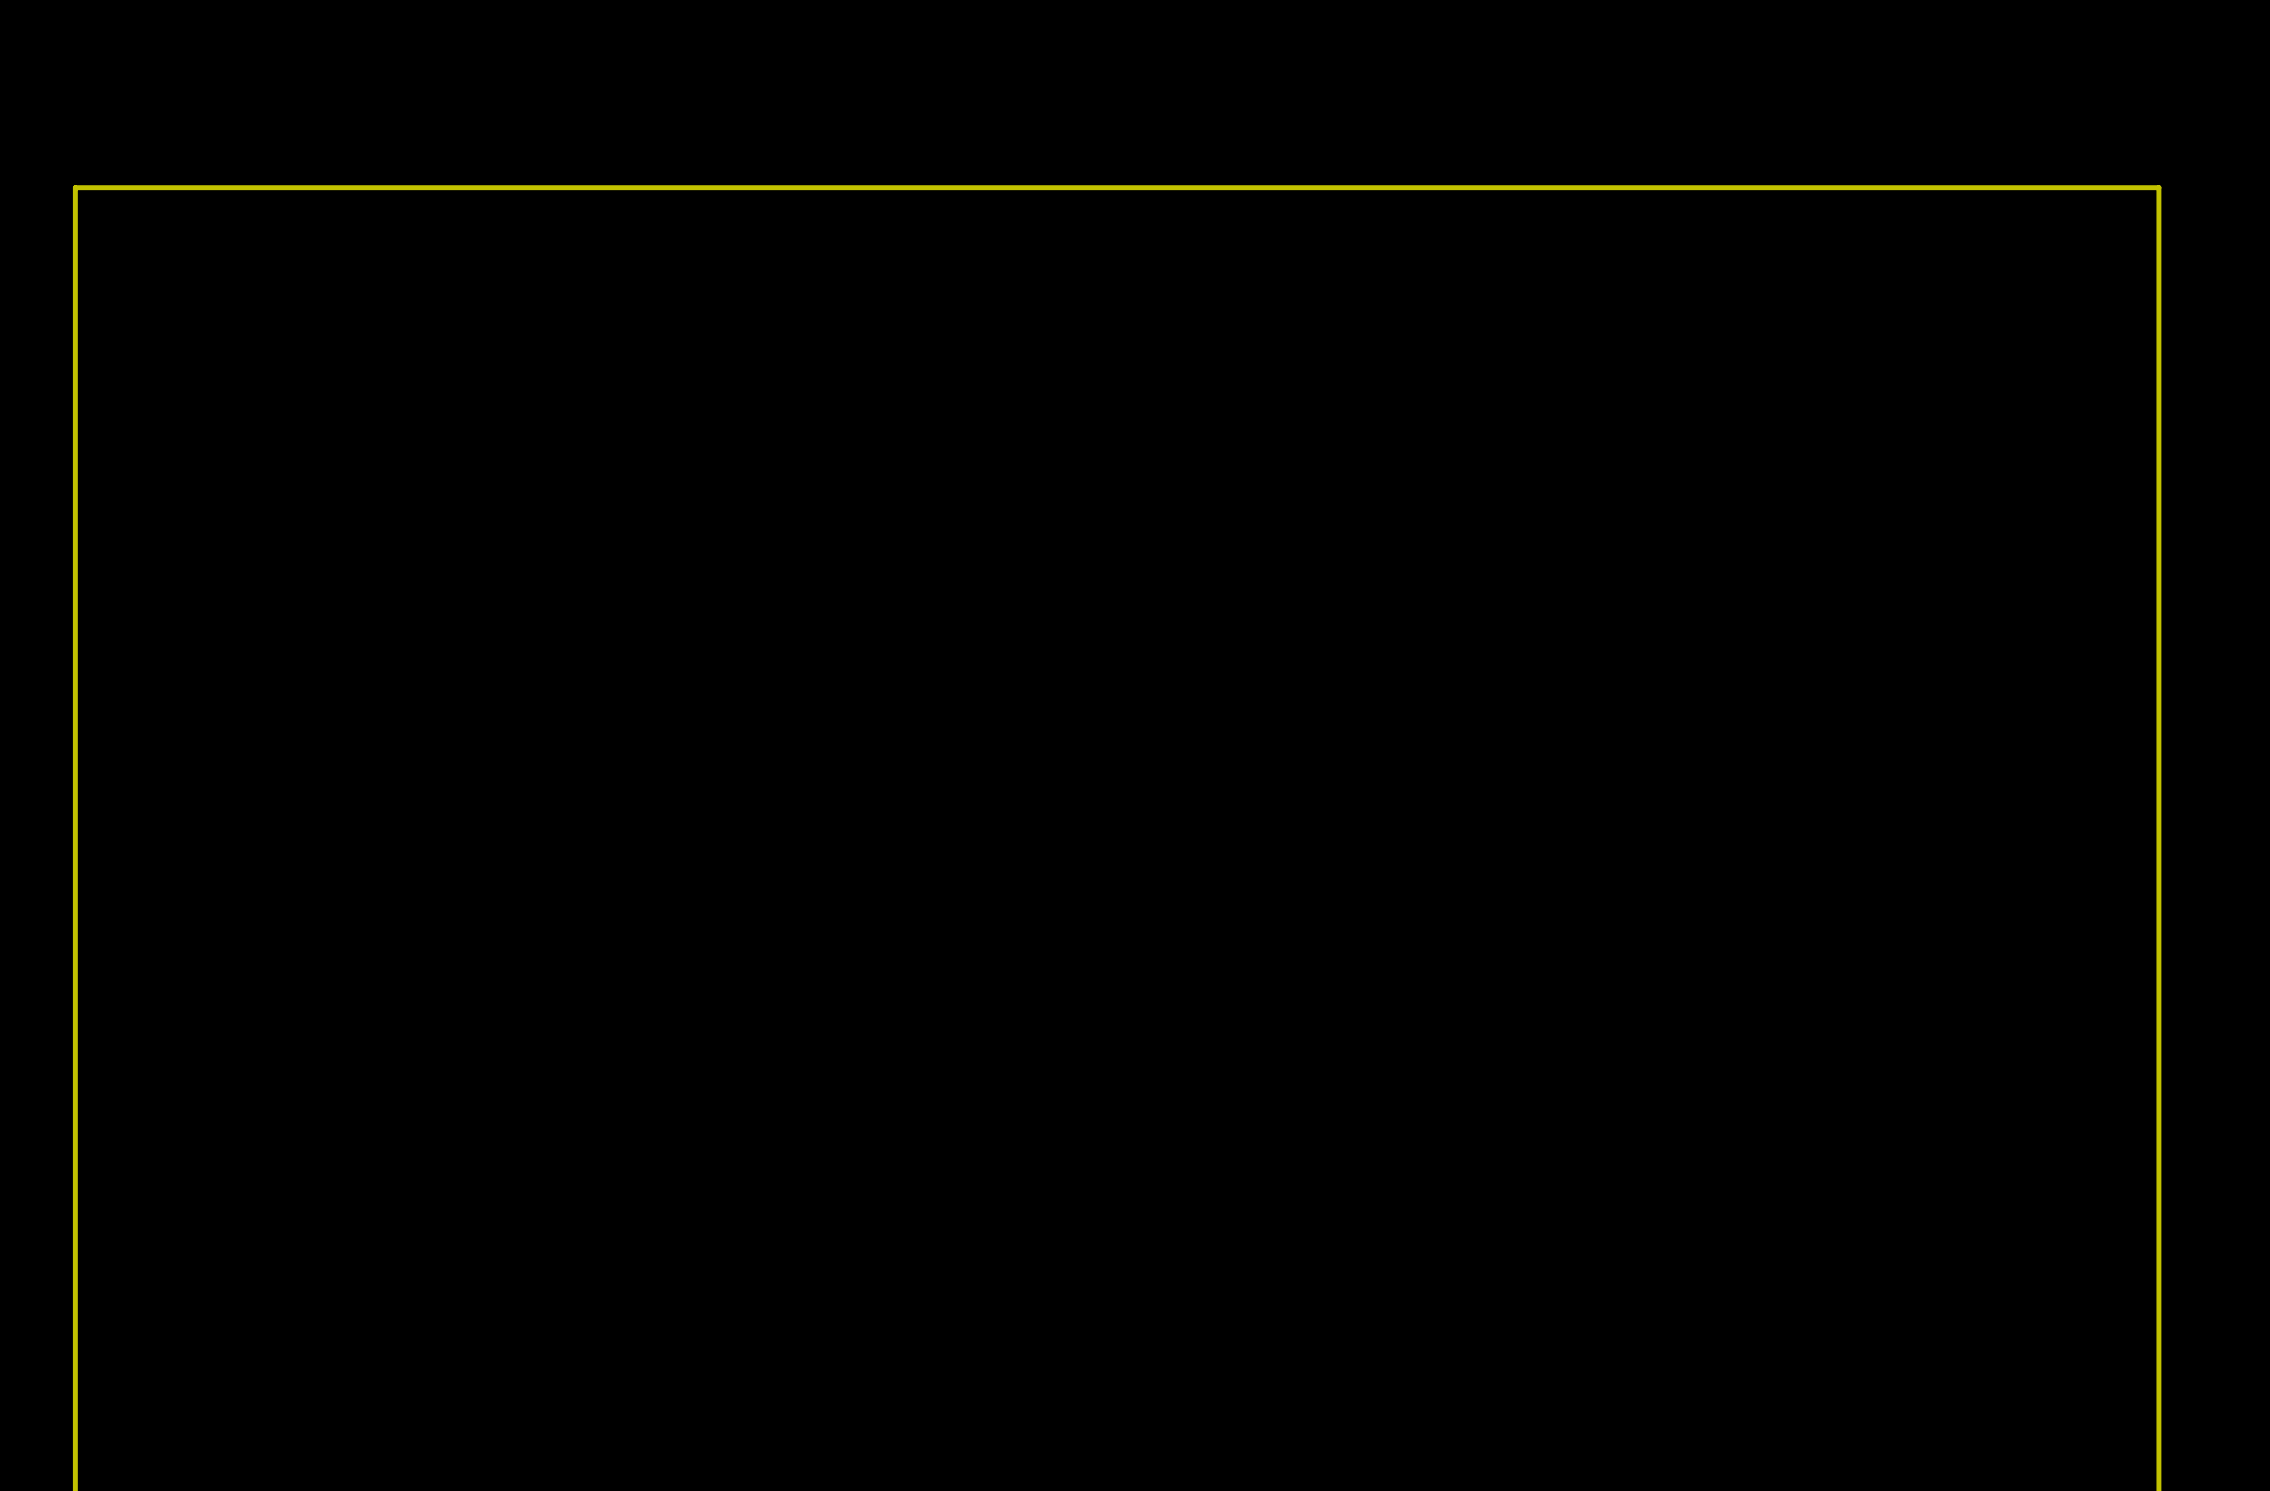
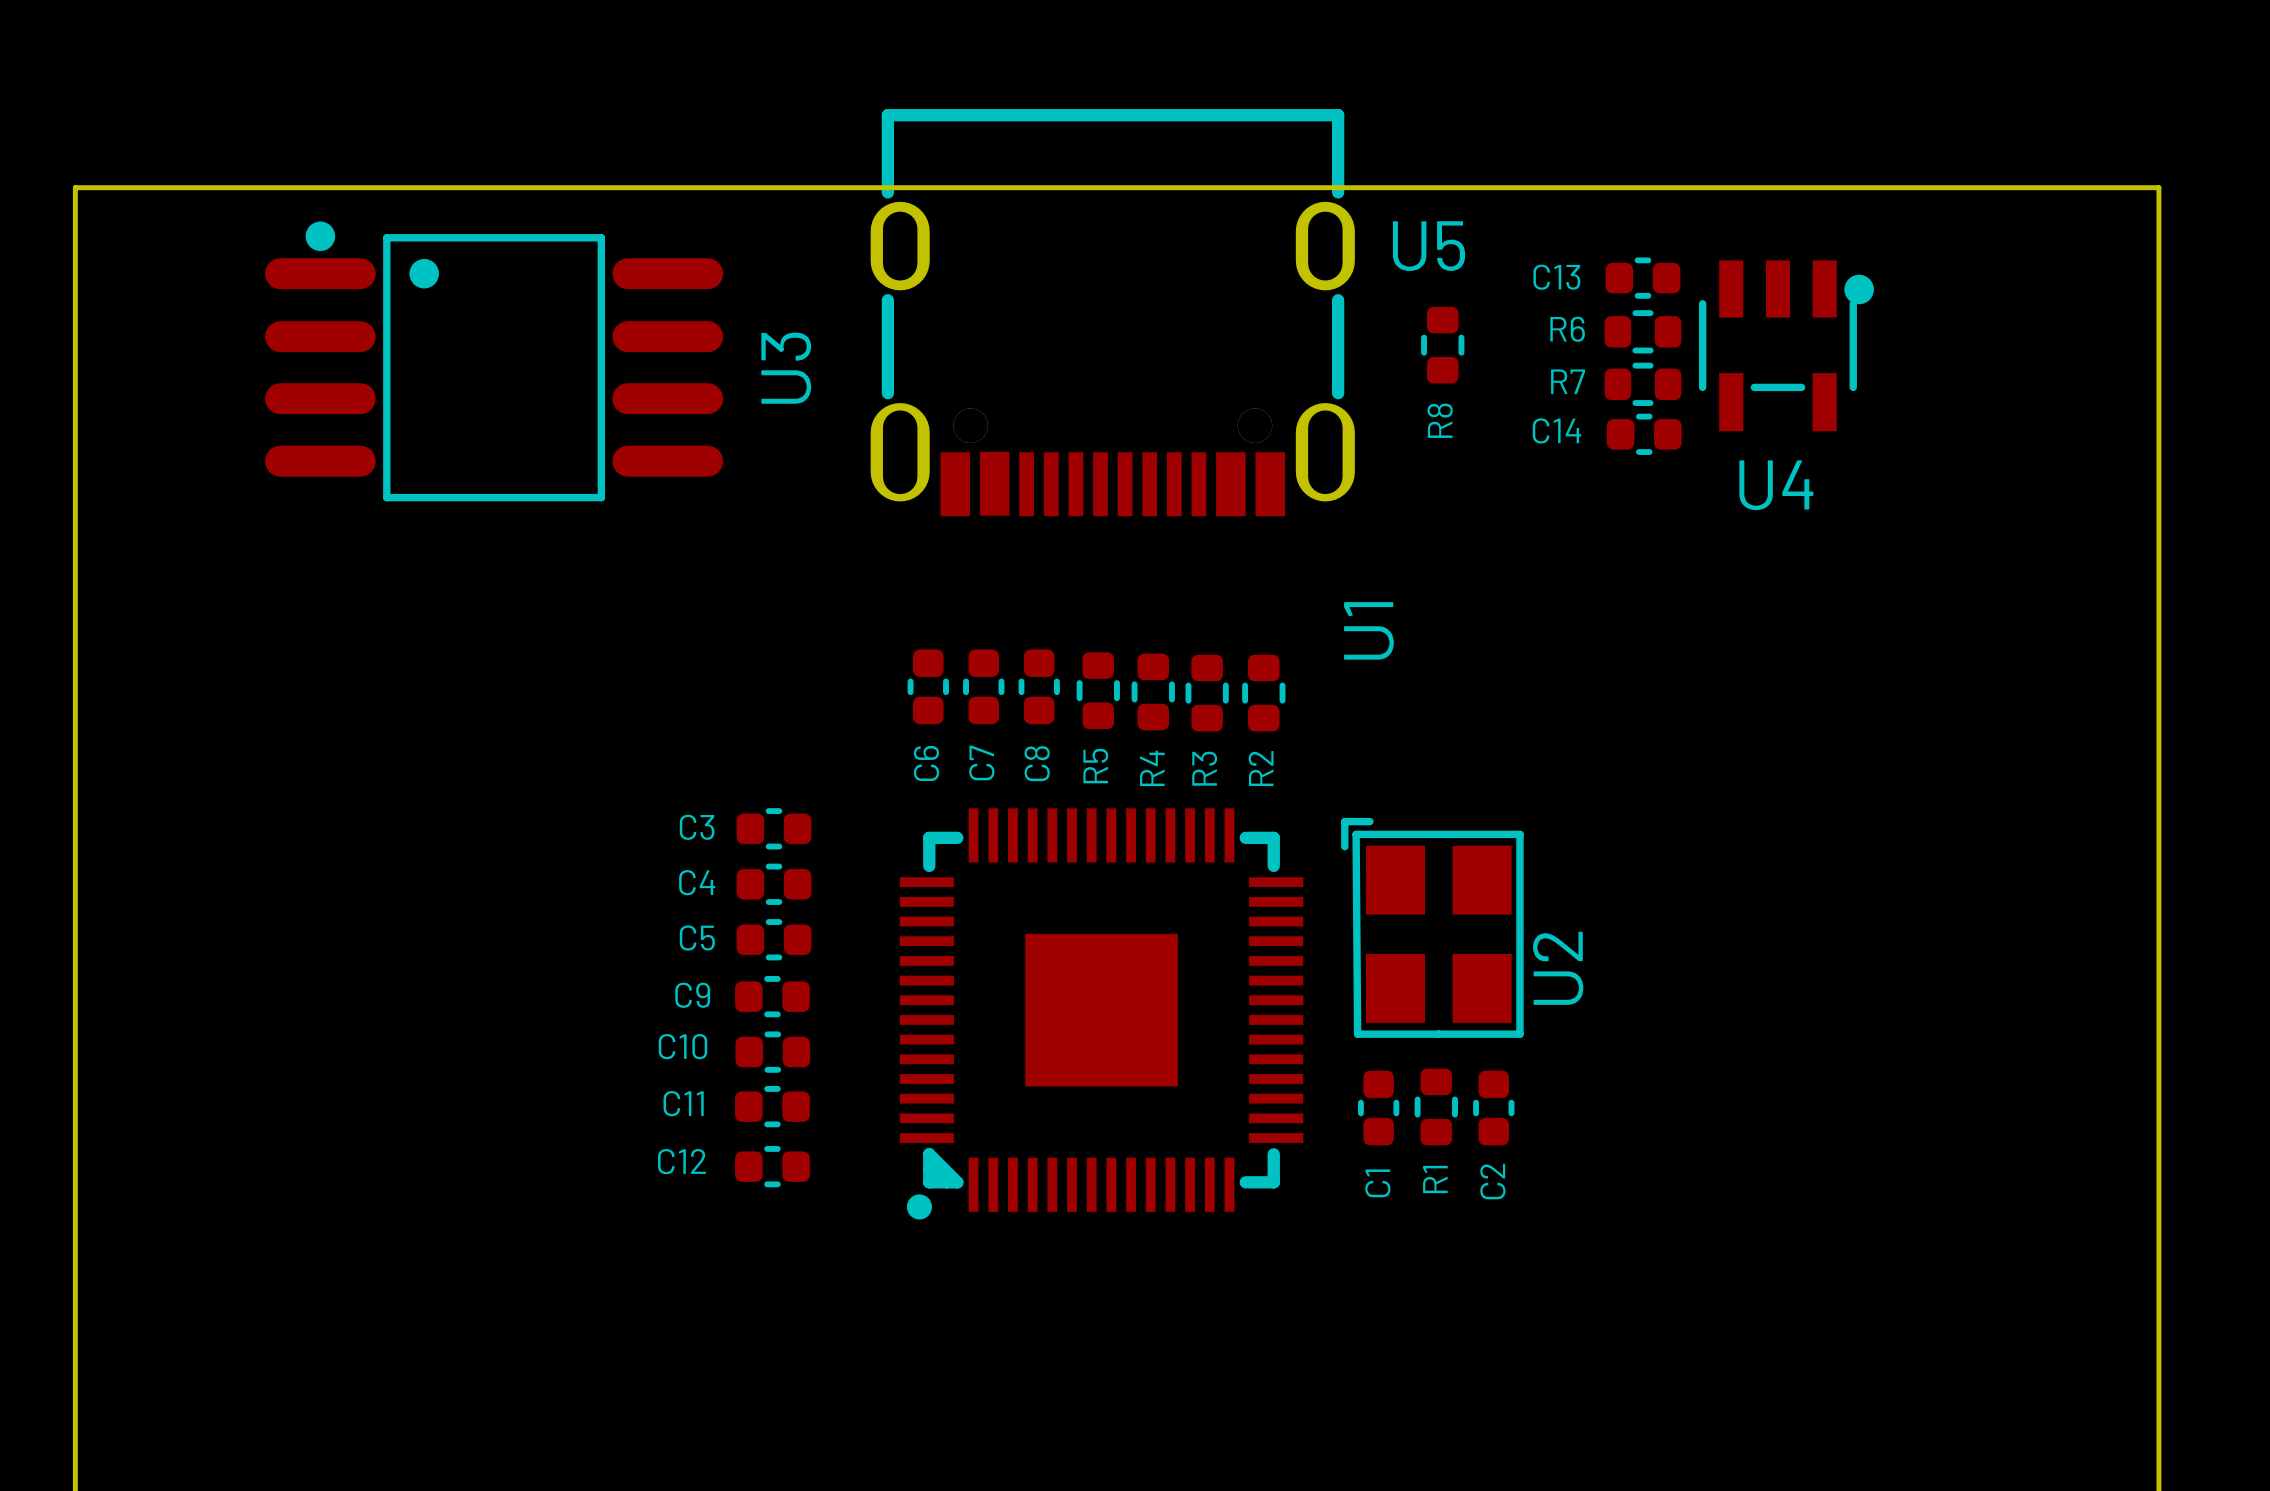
C13: none -> (1642, 278)
U5: none -> (1112, 312)
R6: none -> (1642, 331)
R8: none -> (1442, 345)
U4: none -> (1786, 345)
U3: none -> (494, 361)
R7: none -> (1642, 384)
C14: none -> (1644, 434)
C6: none -> (928, 686)
C7: none -> (983, 686)
C8: none -> (1039, 686)
R5: none -> (1098, 690)
R4: none -> (1153, 691)
R3: none -> (1207, 693)
R2: none -> (1263, 693)
C3: none -> (773, 828)
C4: none -> (773, 884)
U2: none -> (1432, 927)
C5: none -> (773, 939)
C9: none -> (772, 996)
U1: none -> (1101, 1013)
C10: none -> (772, 1052)
C11: none -> (772, 1106)
R1: none -> (1436, 1107)
C1: none -> (1378, 1108)
C2: none -> (1493, 1108)
C12: none -> (772, 1166)

